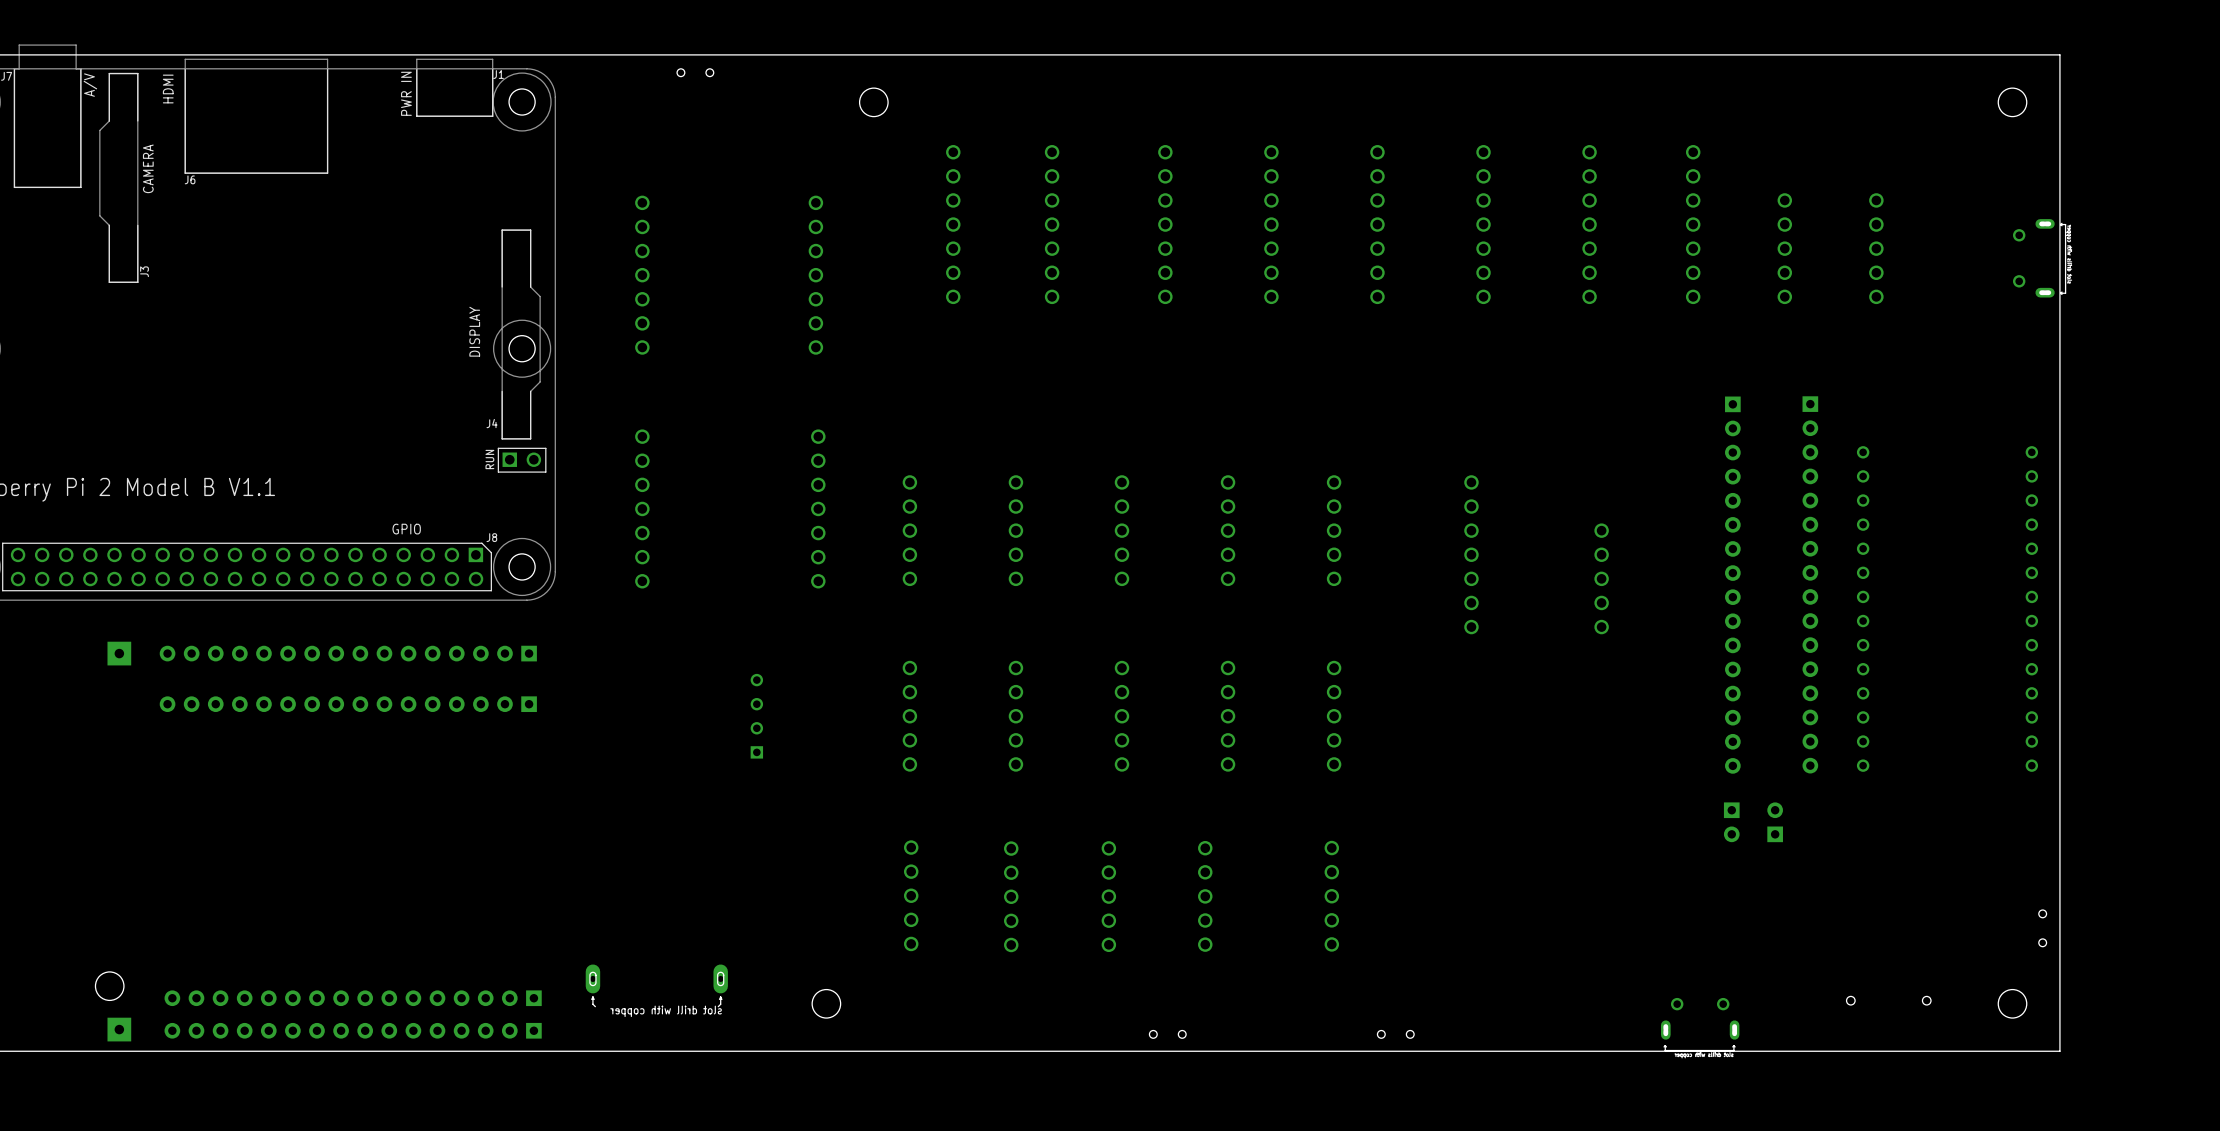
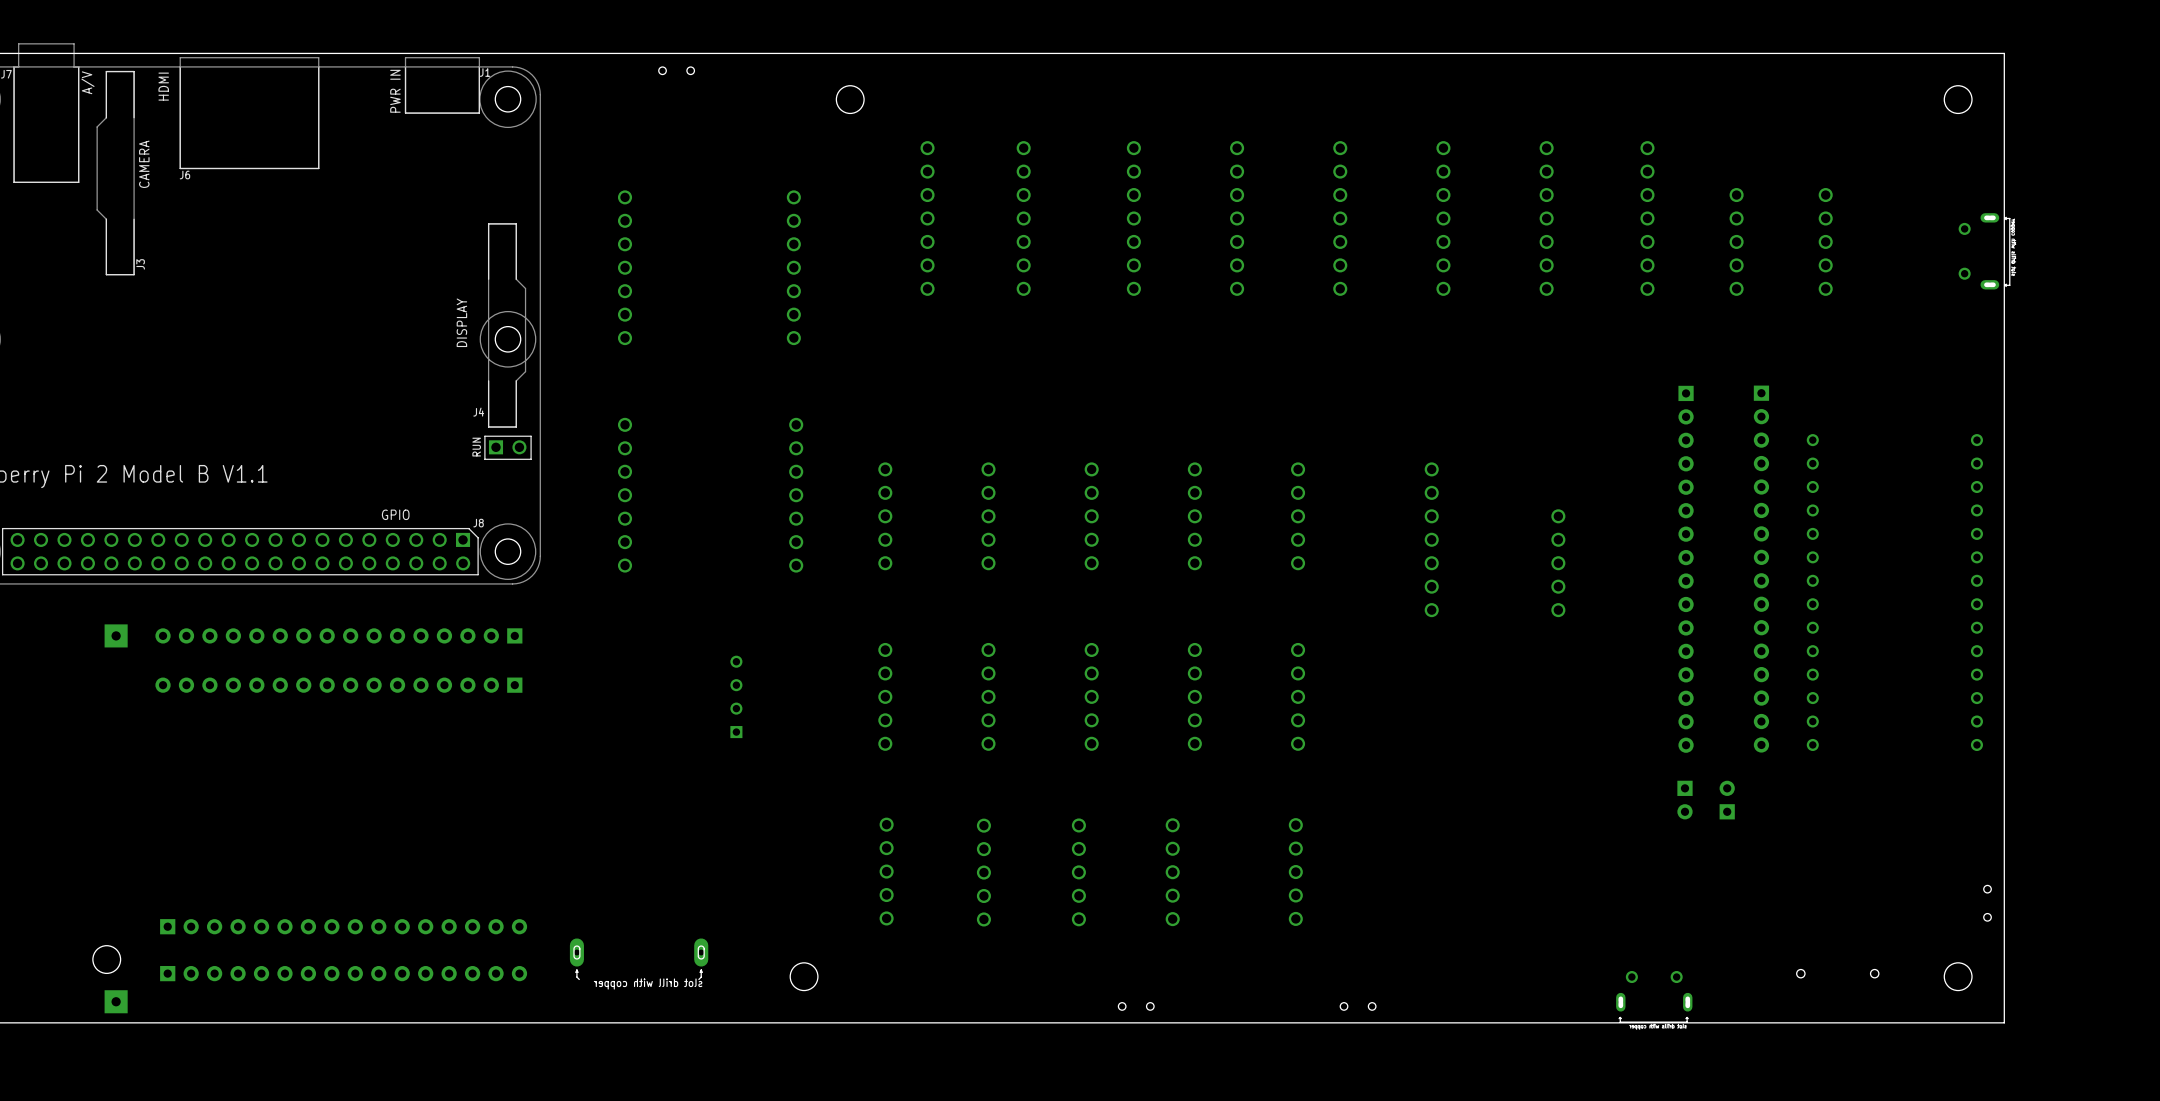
part rotation: 0° (353, 998) -> 180° (343, 973)
part rotation: 0° (353, 1030) -> 180° (343, 926)

